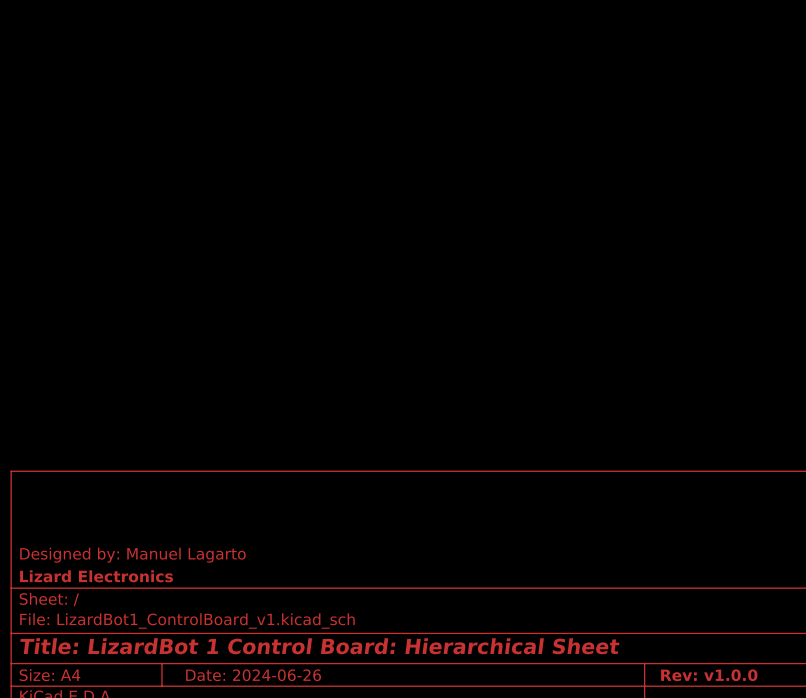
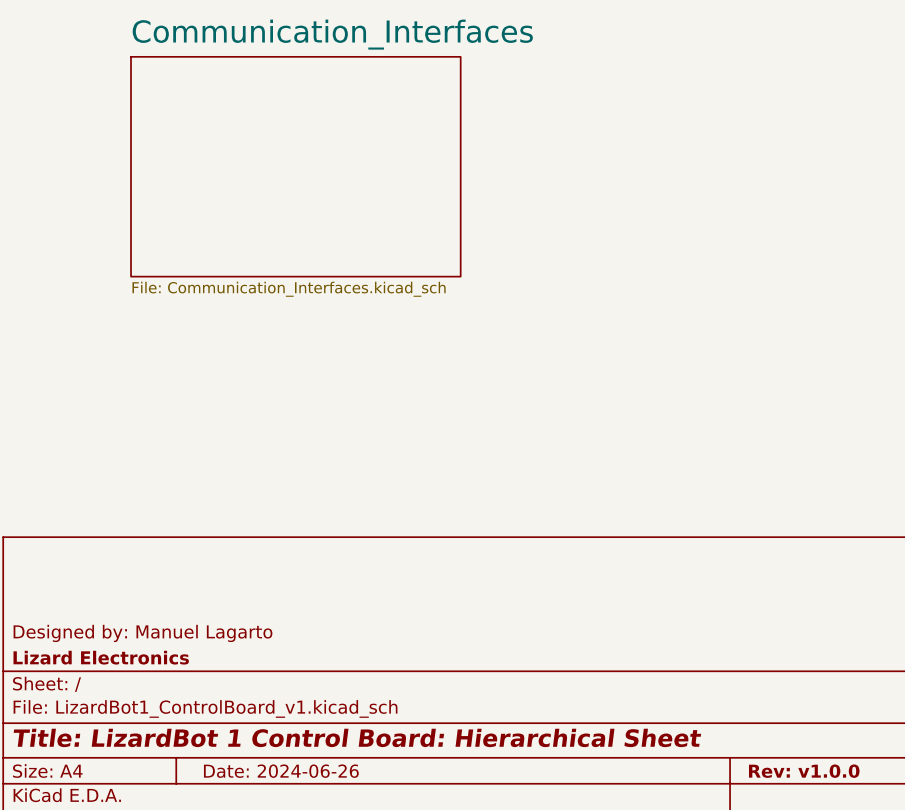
sheet Communication_Interfaces: none -> File: Communication_Interfaces.kicad_sch (295, 166)

